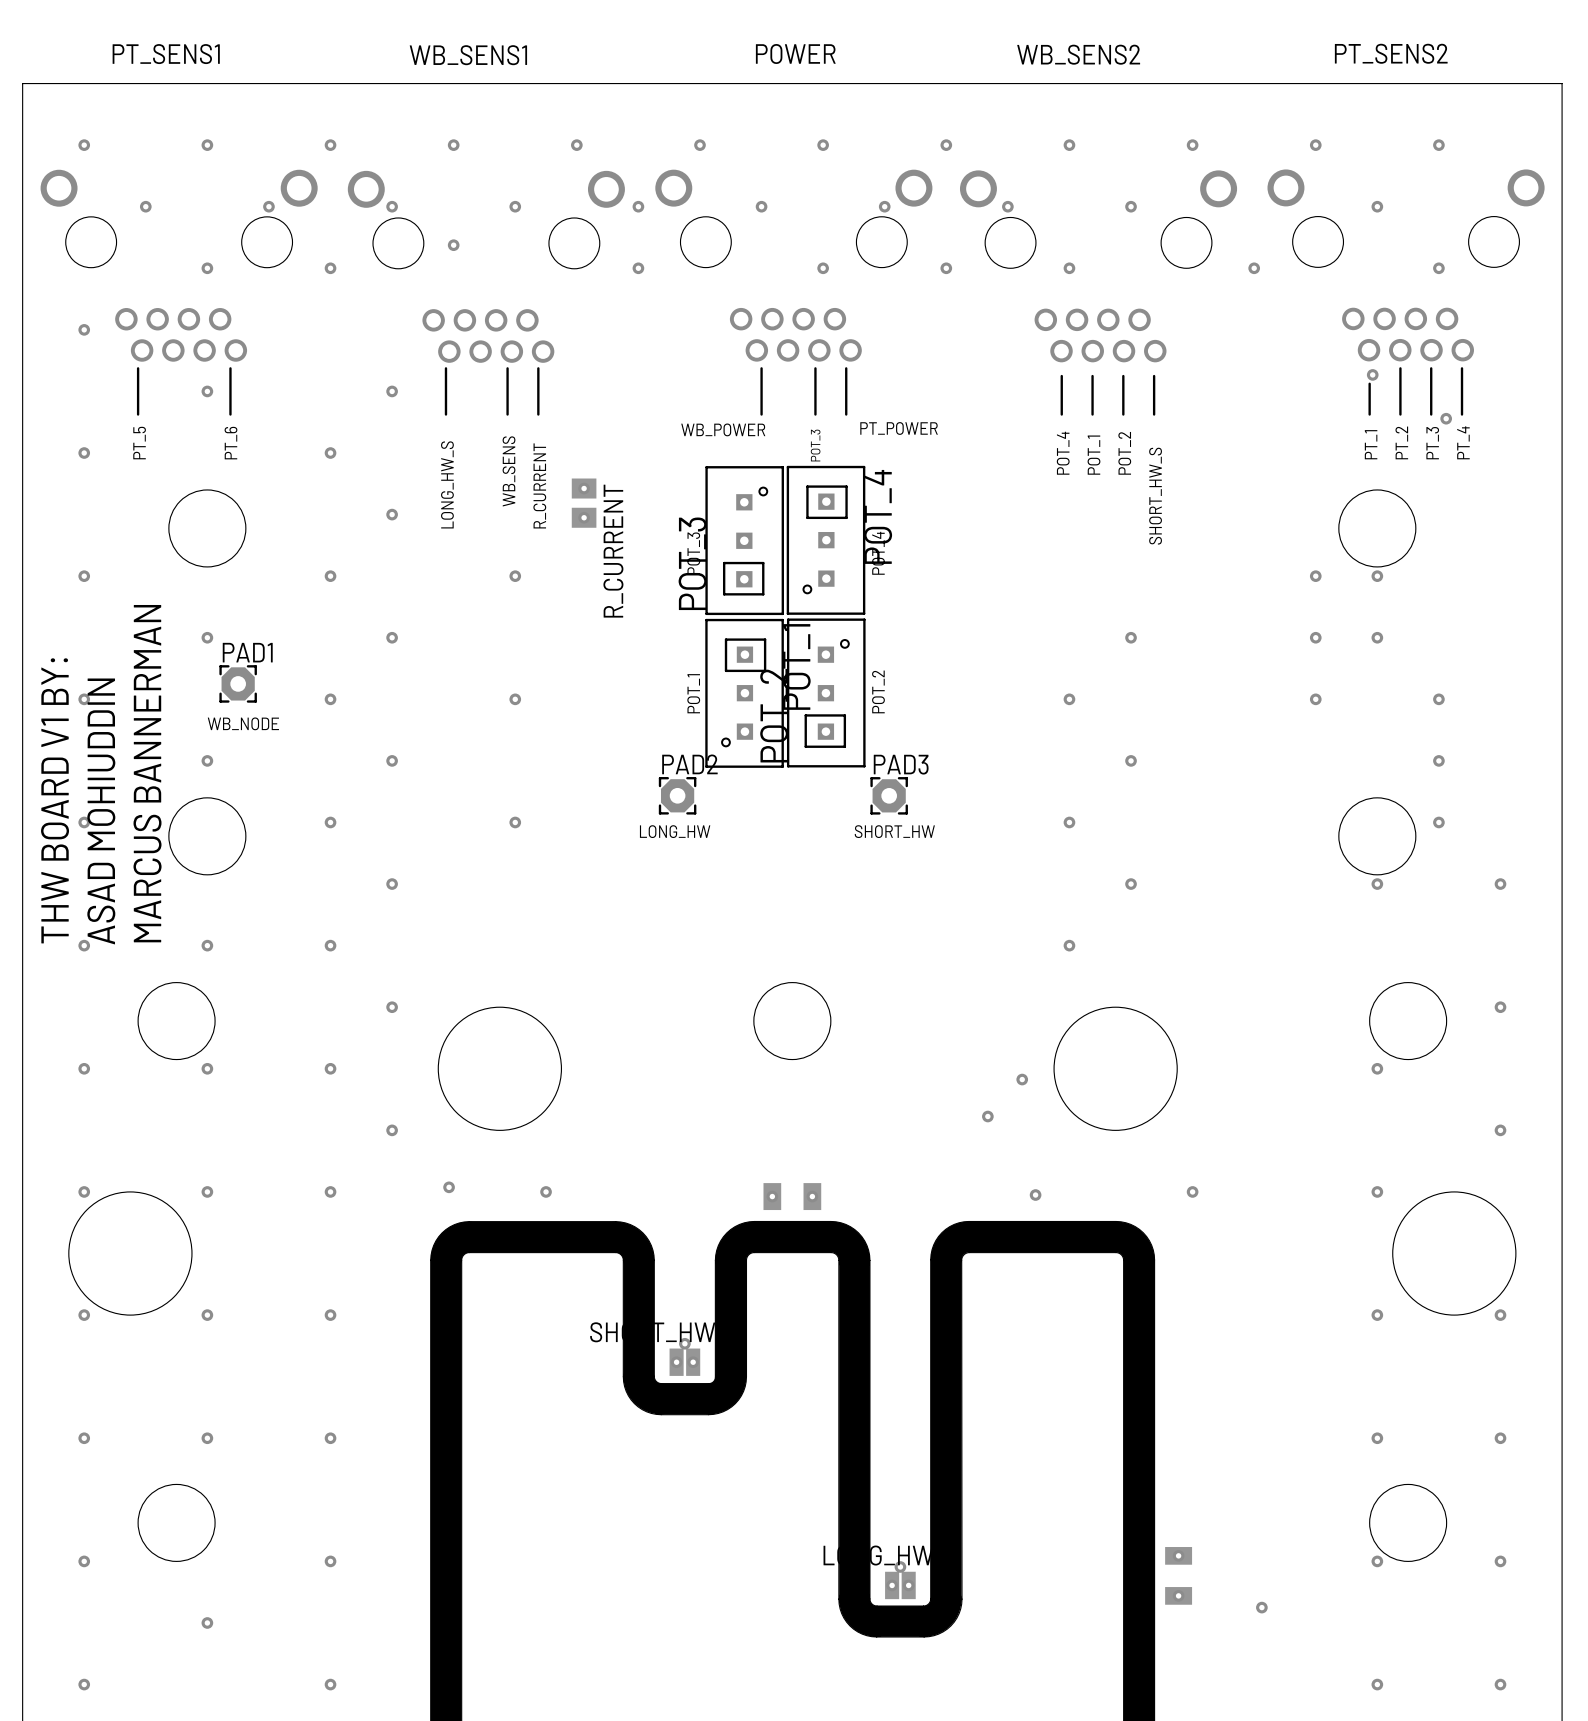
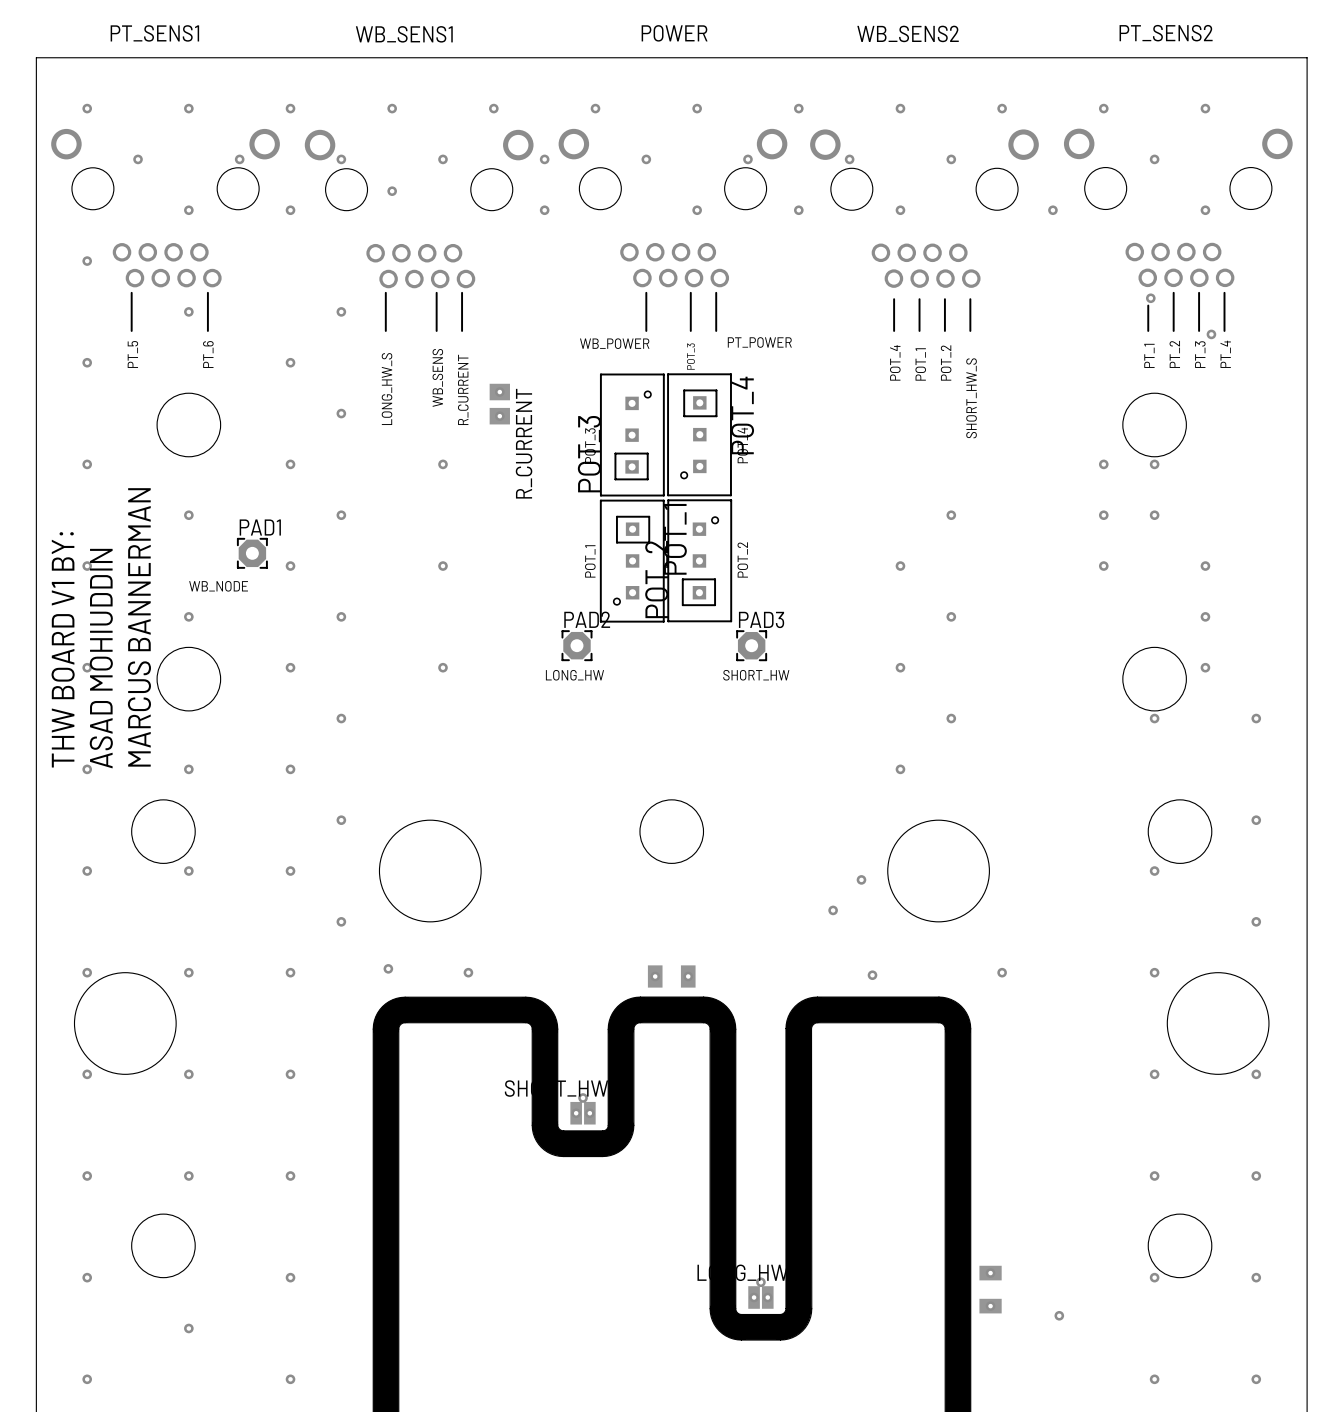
PAD1 position: (238, 683) -> (252, 553)

